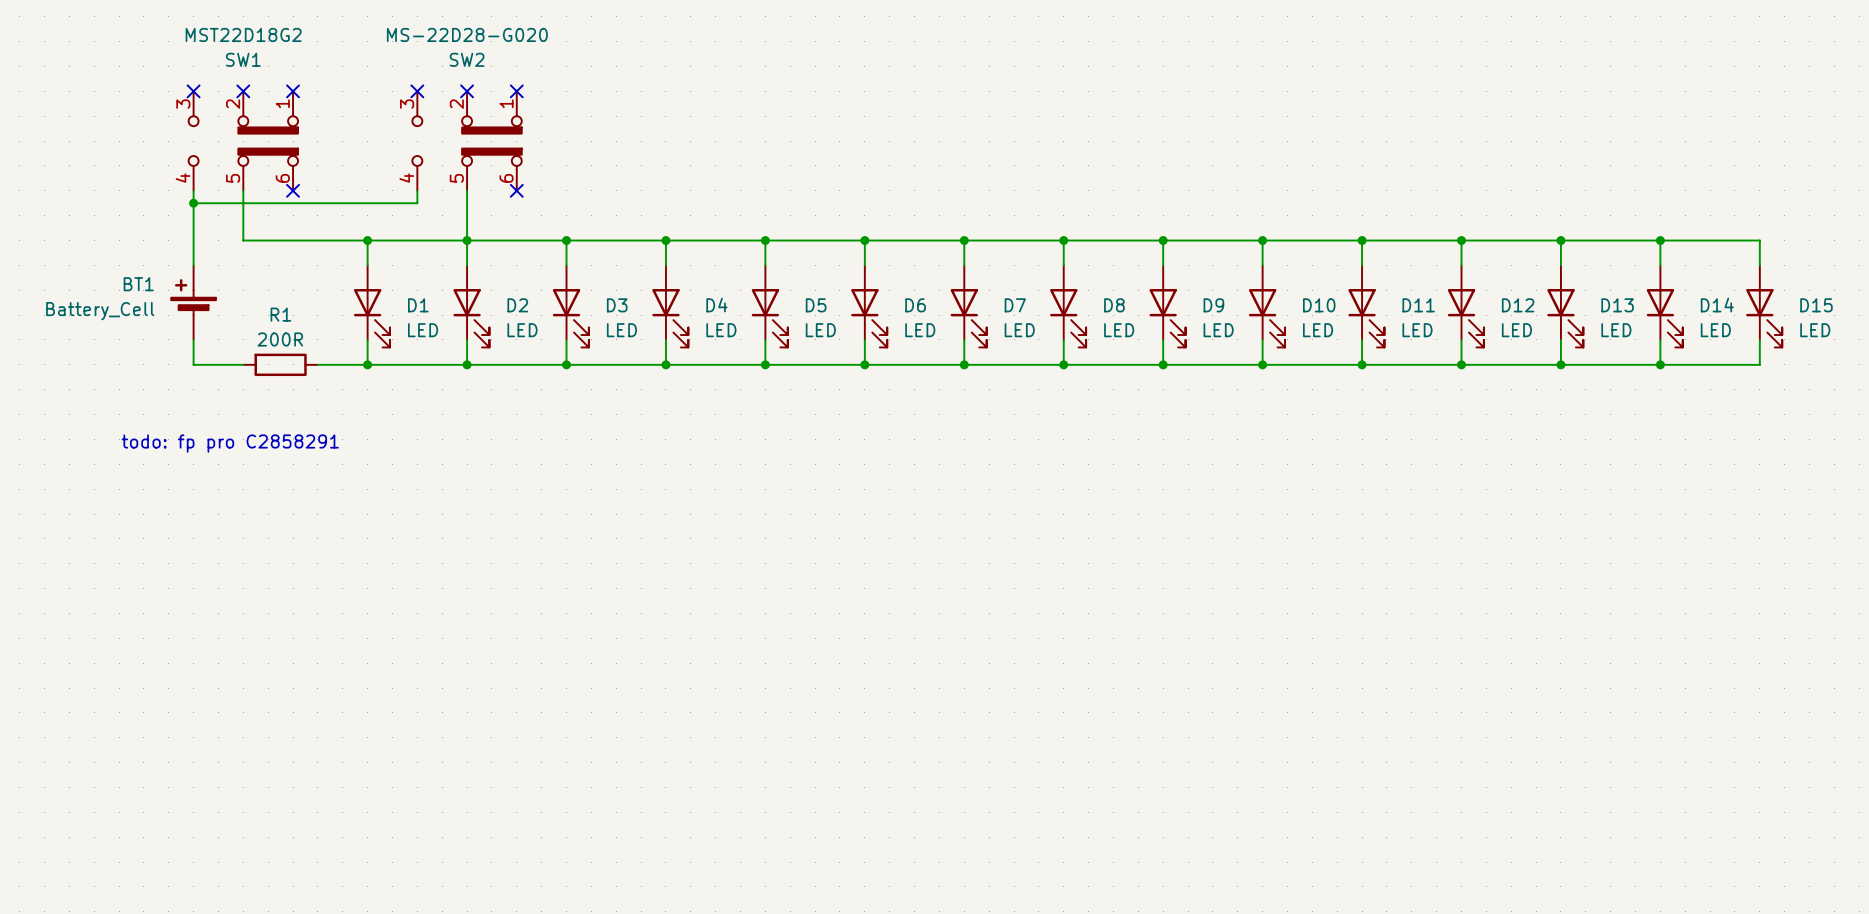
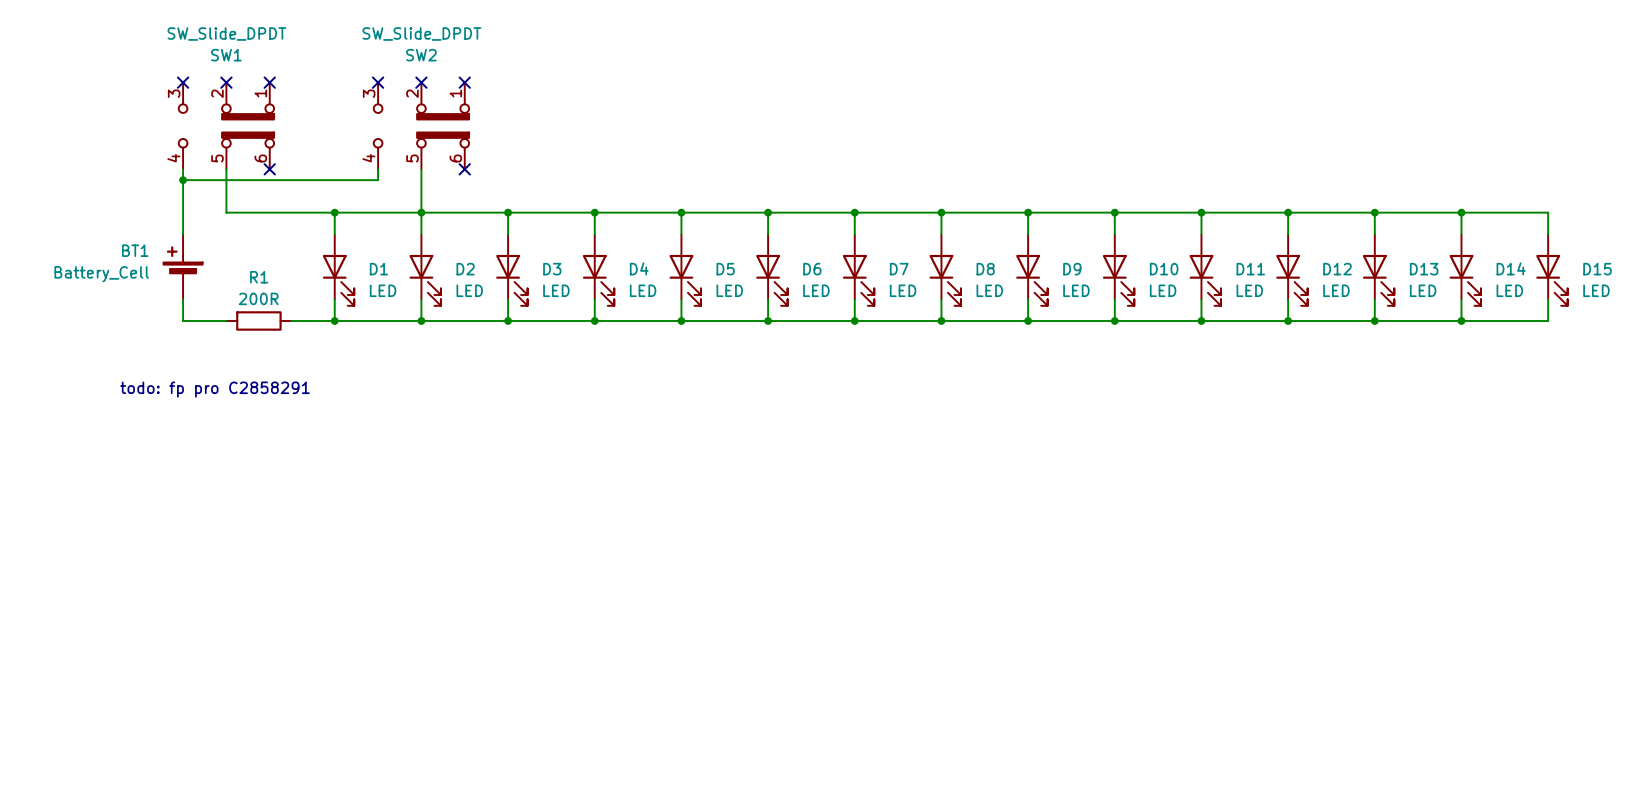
SW1 value: MST22D18G2 (243, 34) -> SW_Slide_DPDT (226, 34)
SW2 value: MS-22D28-G020 (467, 34) -> SW_Slide_DPDT (421, 34)

